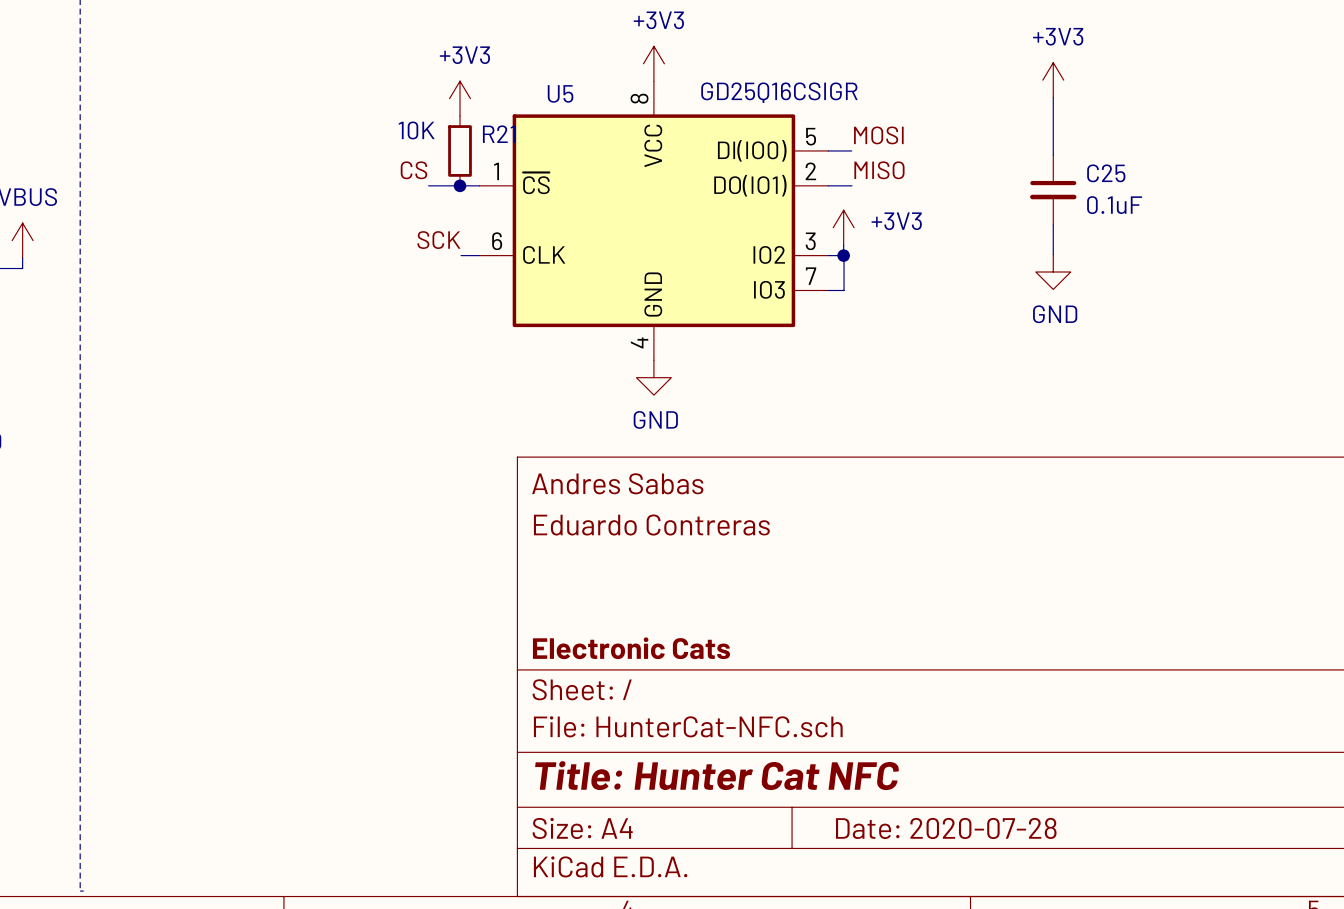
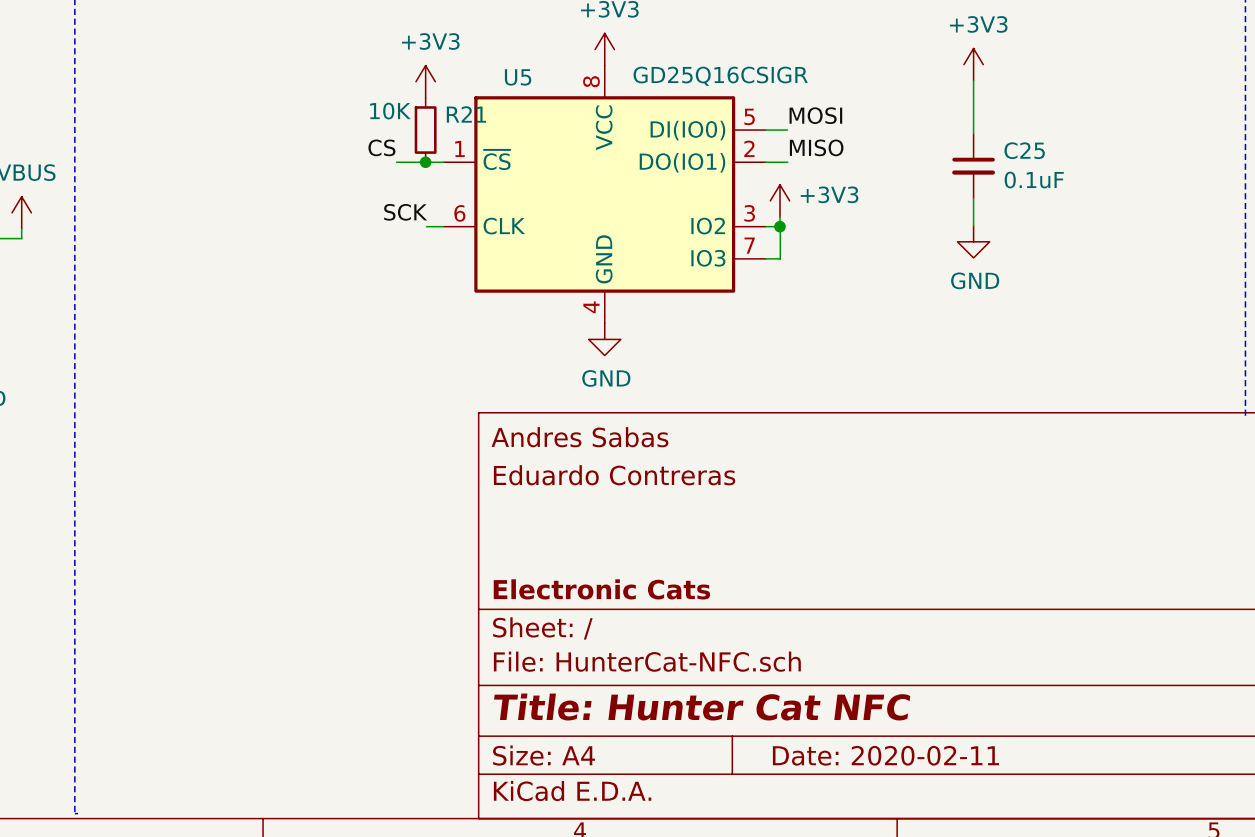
title block: Date: 2020-07-28 (946, 828) -> Date: 2020-02-11 (885, 755)

